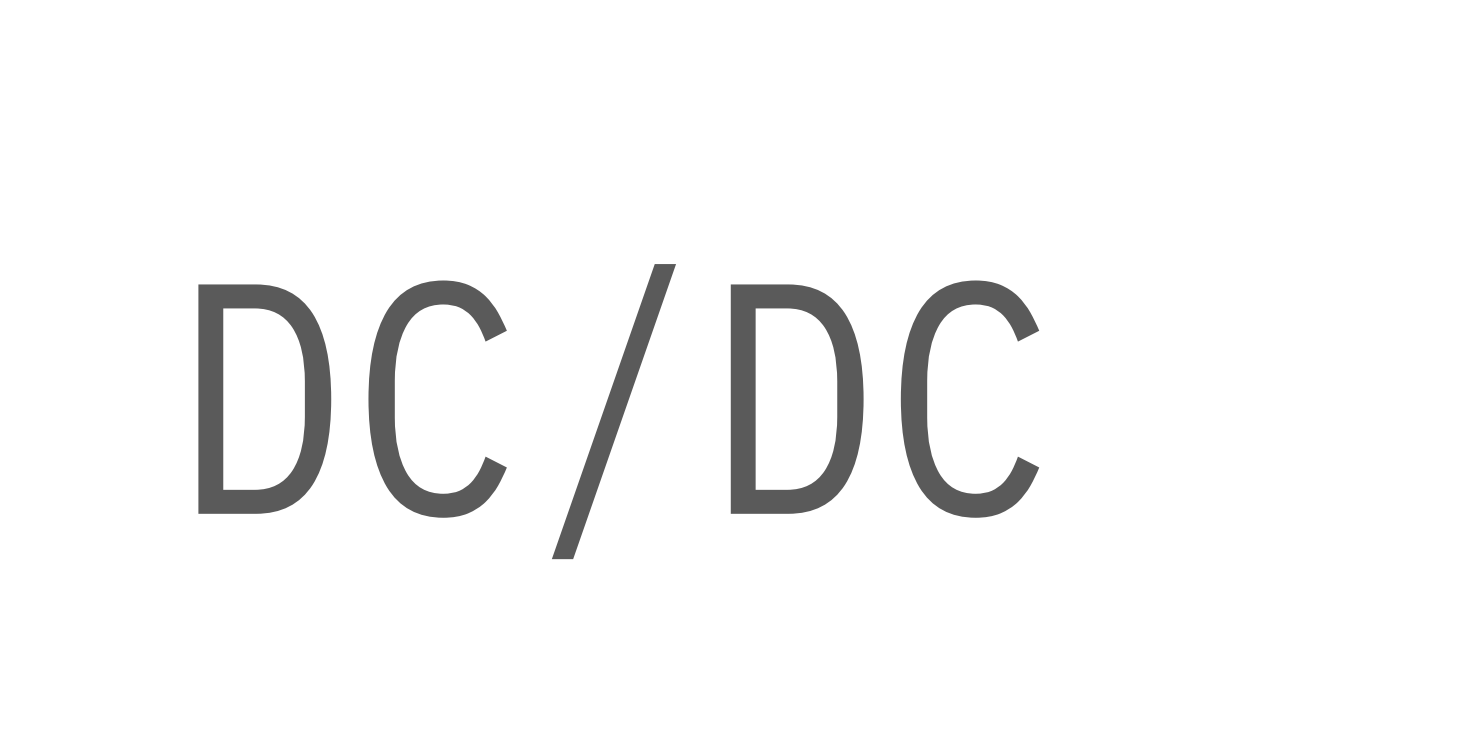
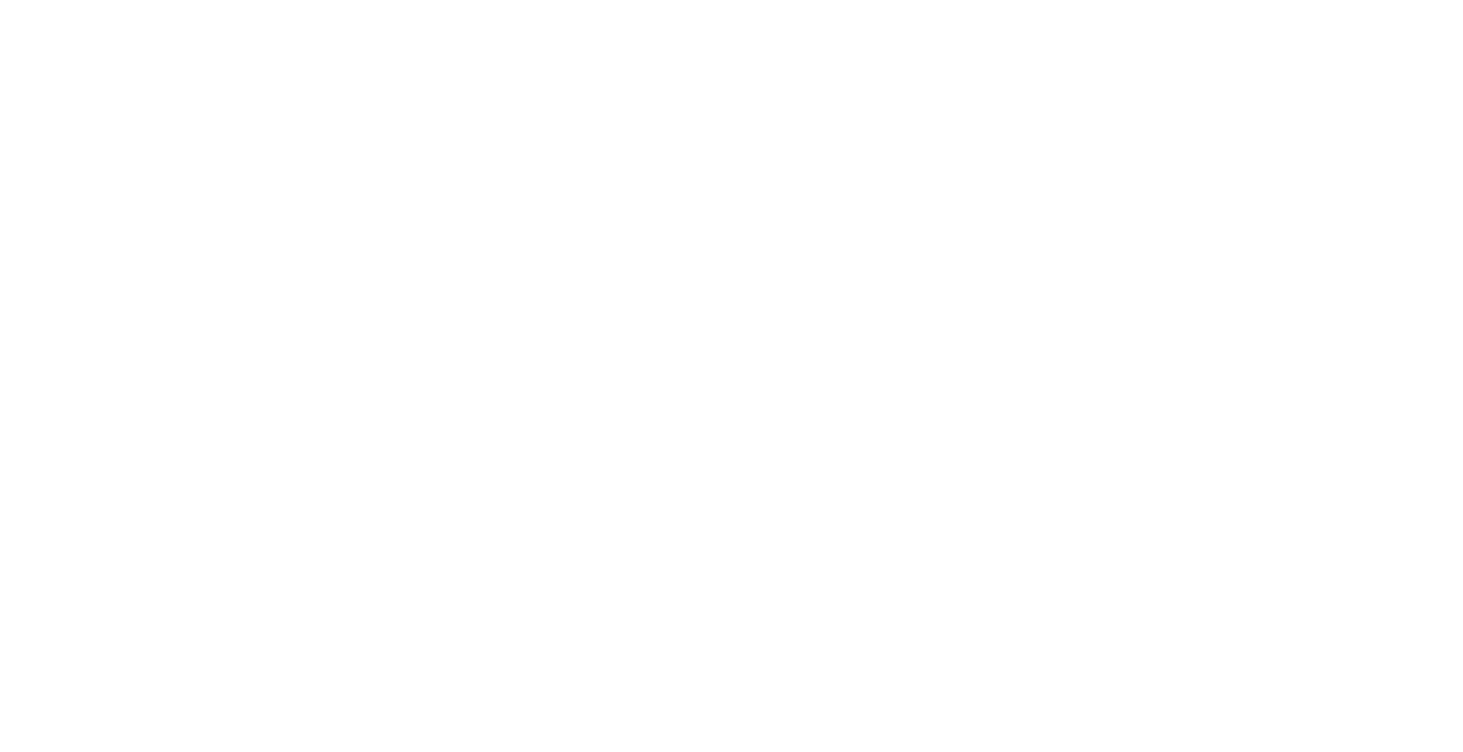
text: DC/DC (618, 411) -> none

